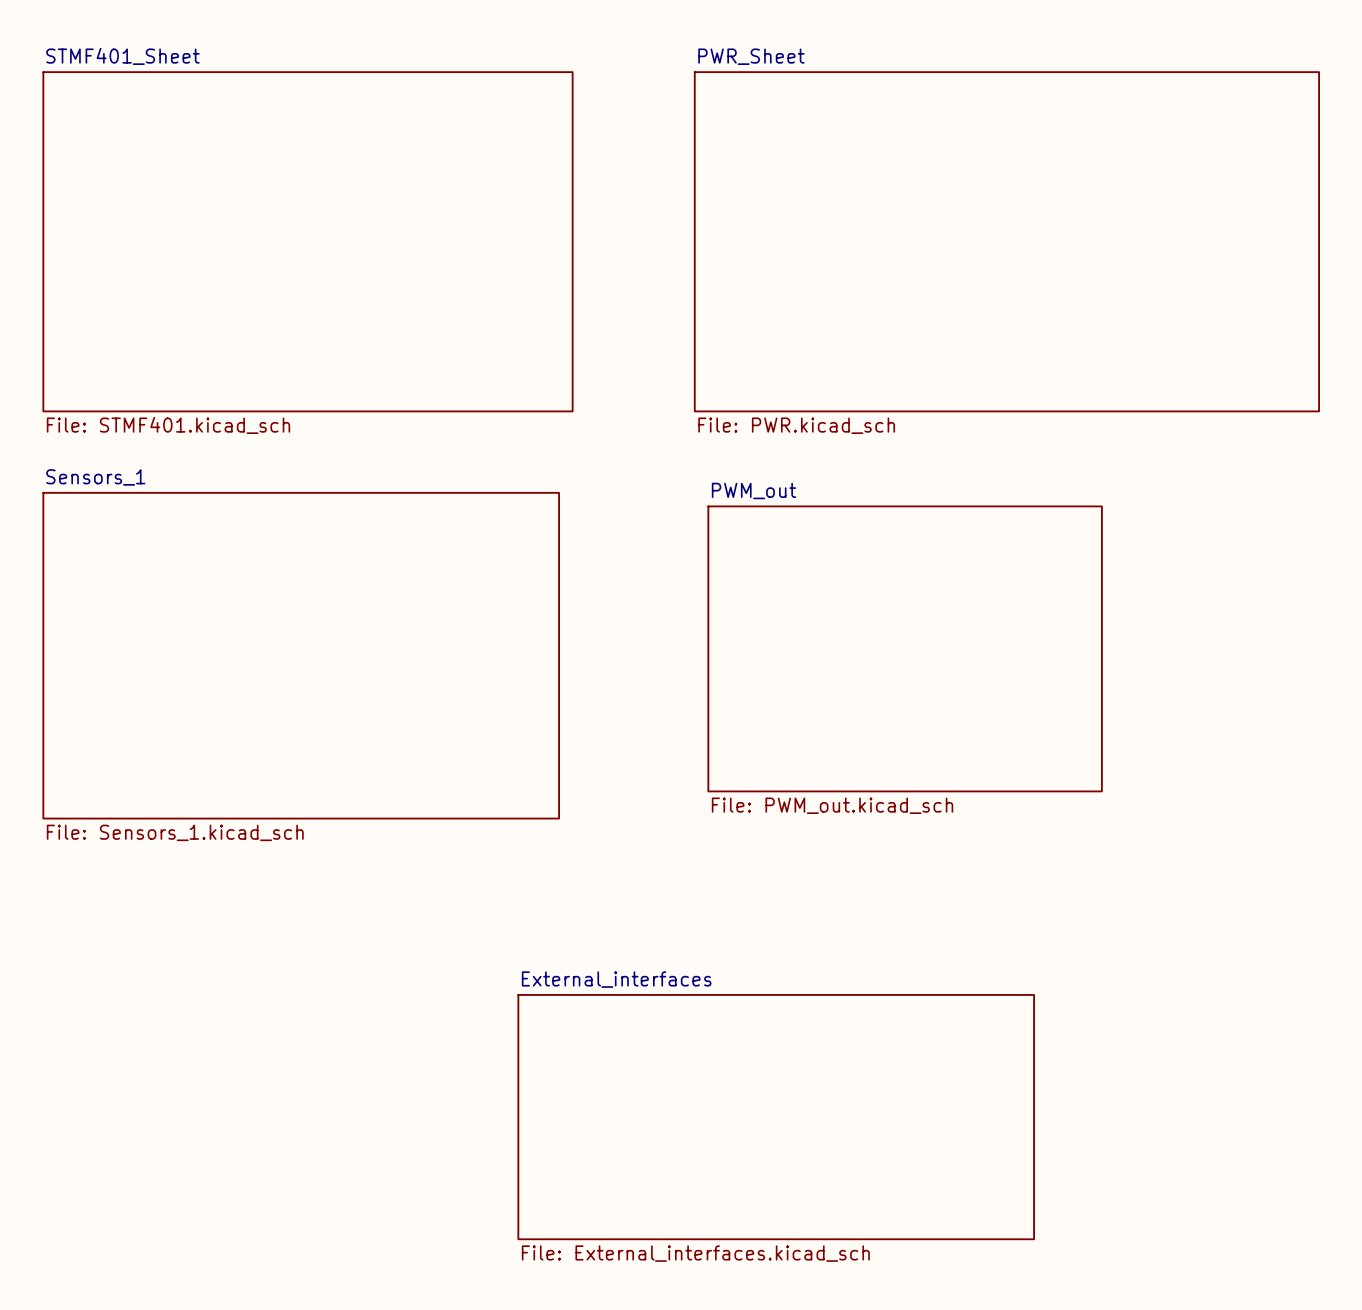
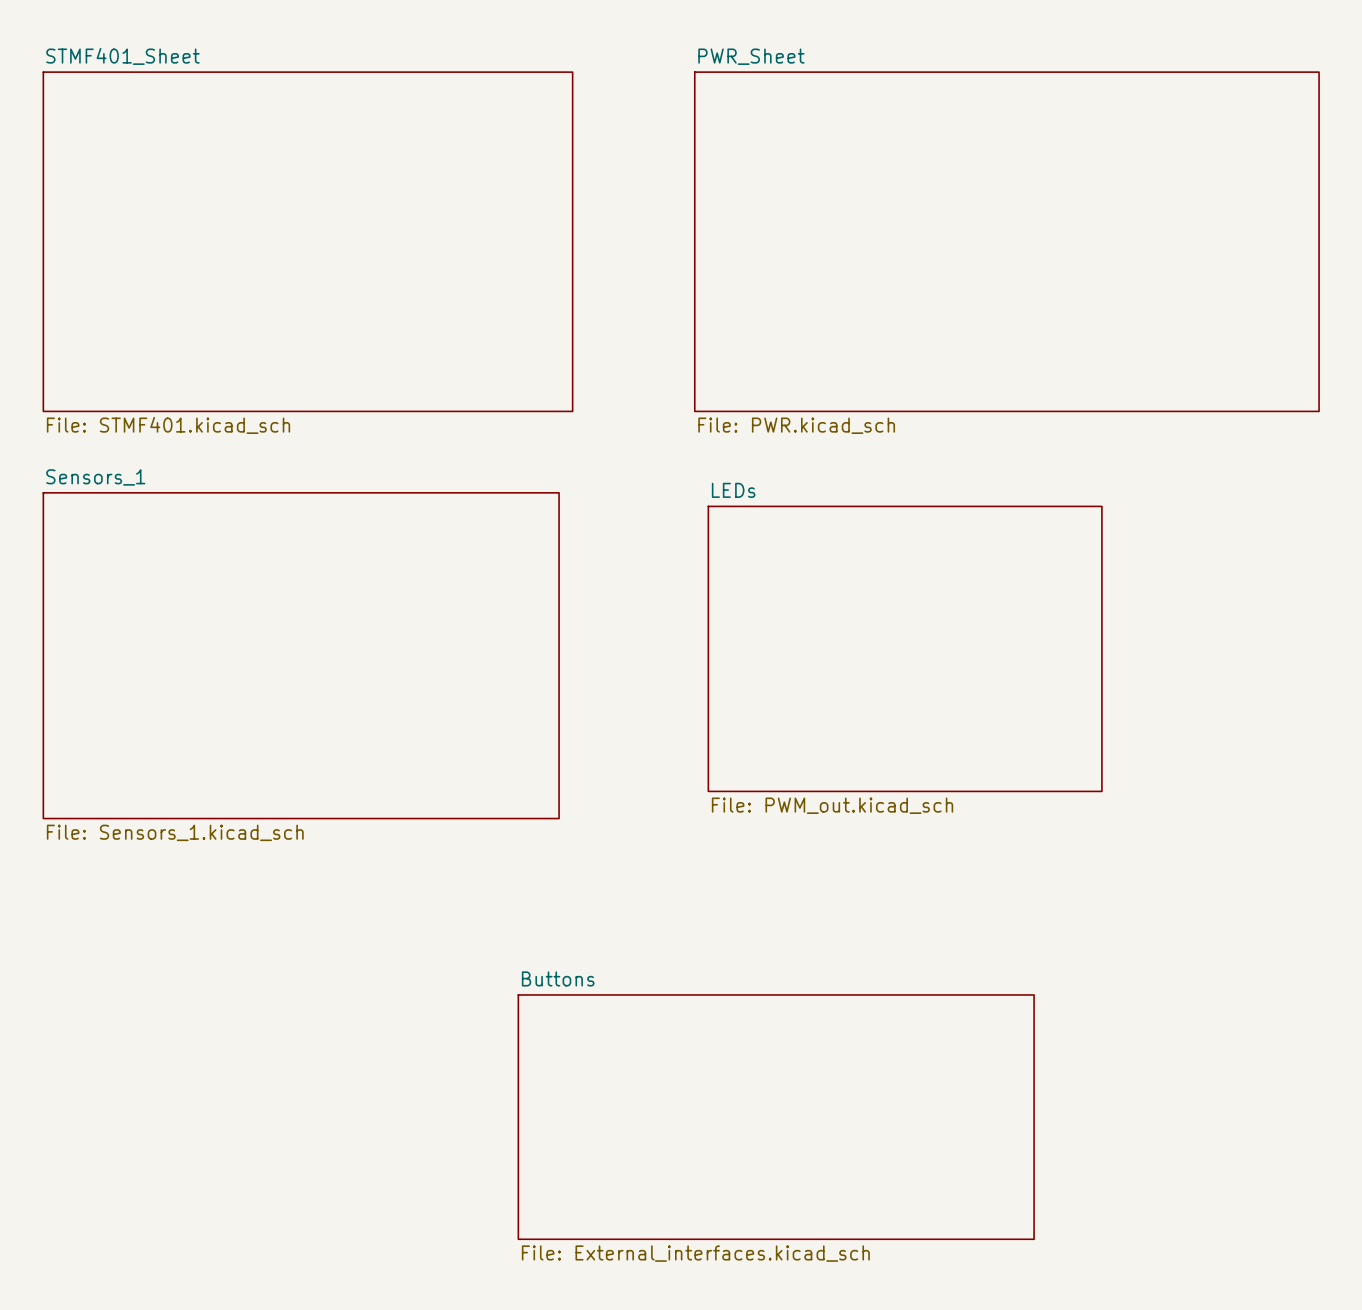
sheet PWM_out name: PWM_out (754, 491) -> LEDs (733, 490)
sheet External_interfaces name: External_interfaces (616, 979) -> Buttons (558, 978)

